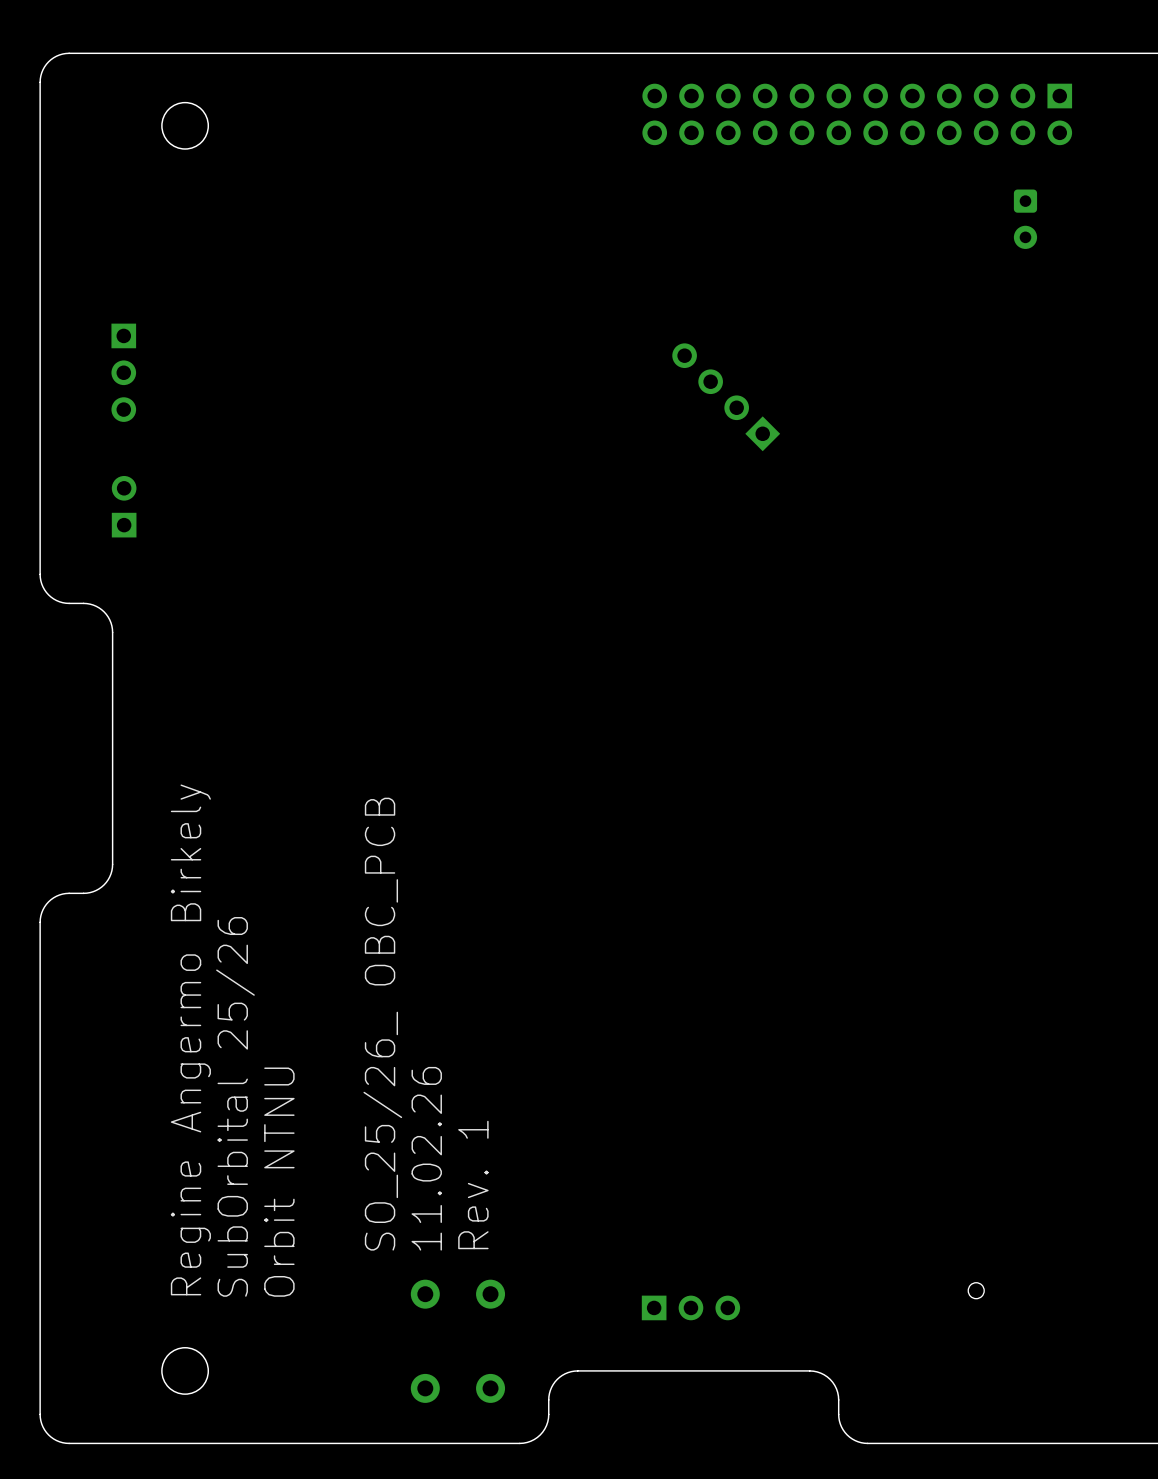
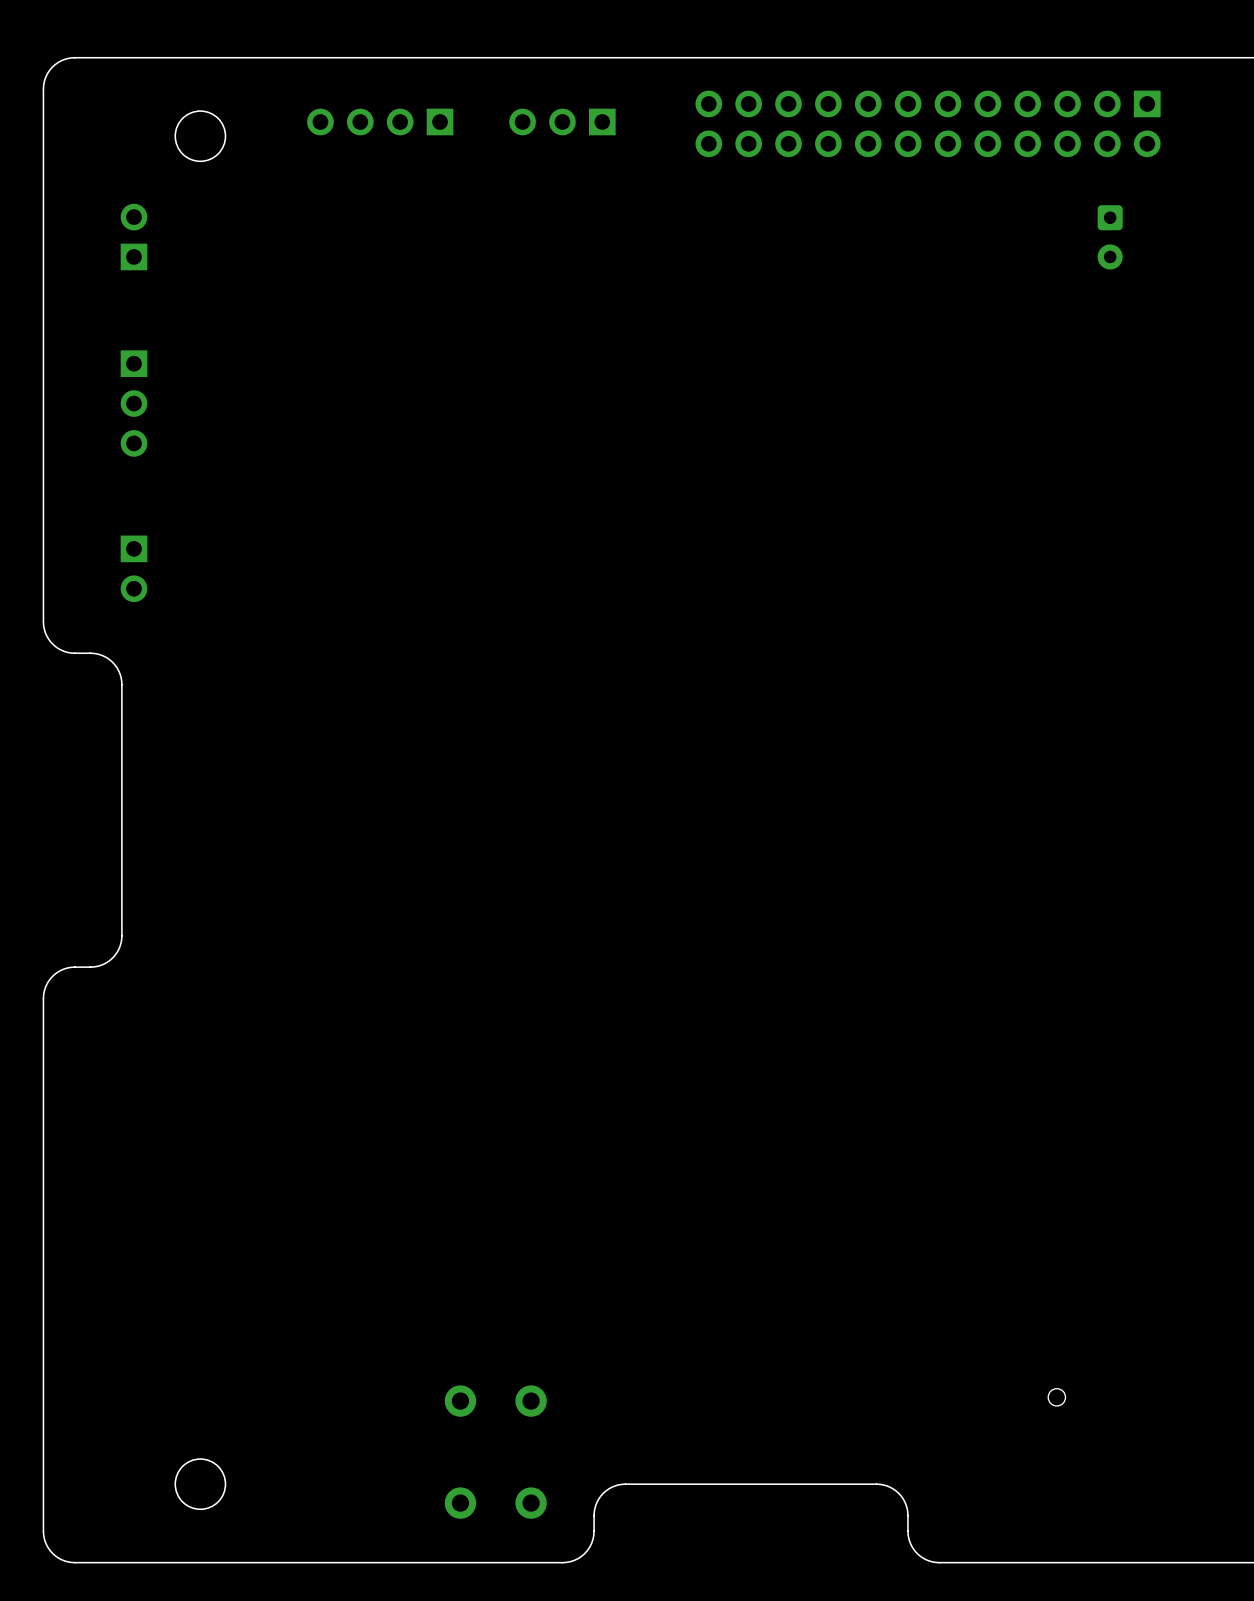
part: none -> (380, 121)
part: none -> (562, 121)
part: none -> (134, 237)
part: (726, 397) -> none
part rotation: 0° (124, 506) -> 180° (134, 568)
text: SO_25/26_ OBC_PCB (382, 1024) -> none
text: Regine Angermo Birkely (190, 1039) -> none
text: SubOrbital 25/26 (235, 1106) -> none
text: 11.02.26 (426, 1158) -> none
text: Orbit NTNU (279, 1182) -> none
text: Rev. 1 (473, 1184) -> none
part: (690, 1307) -> none

